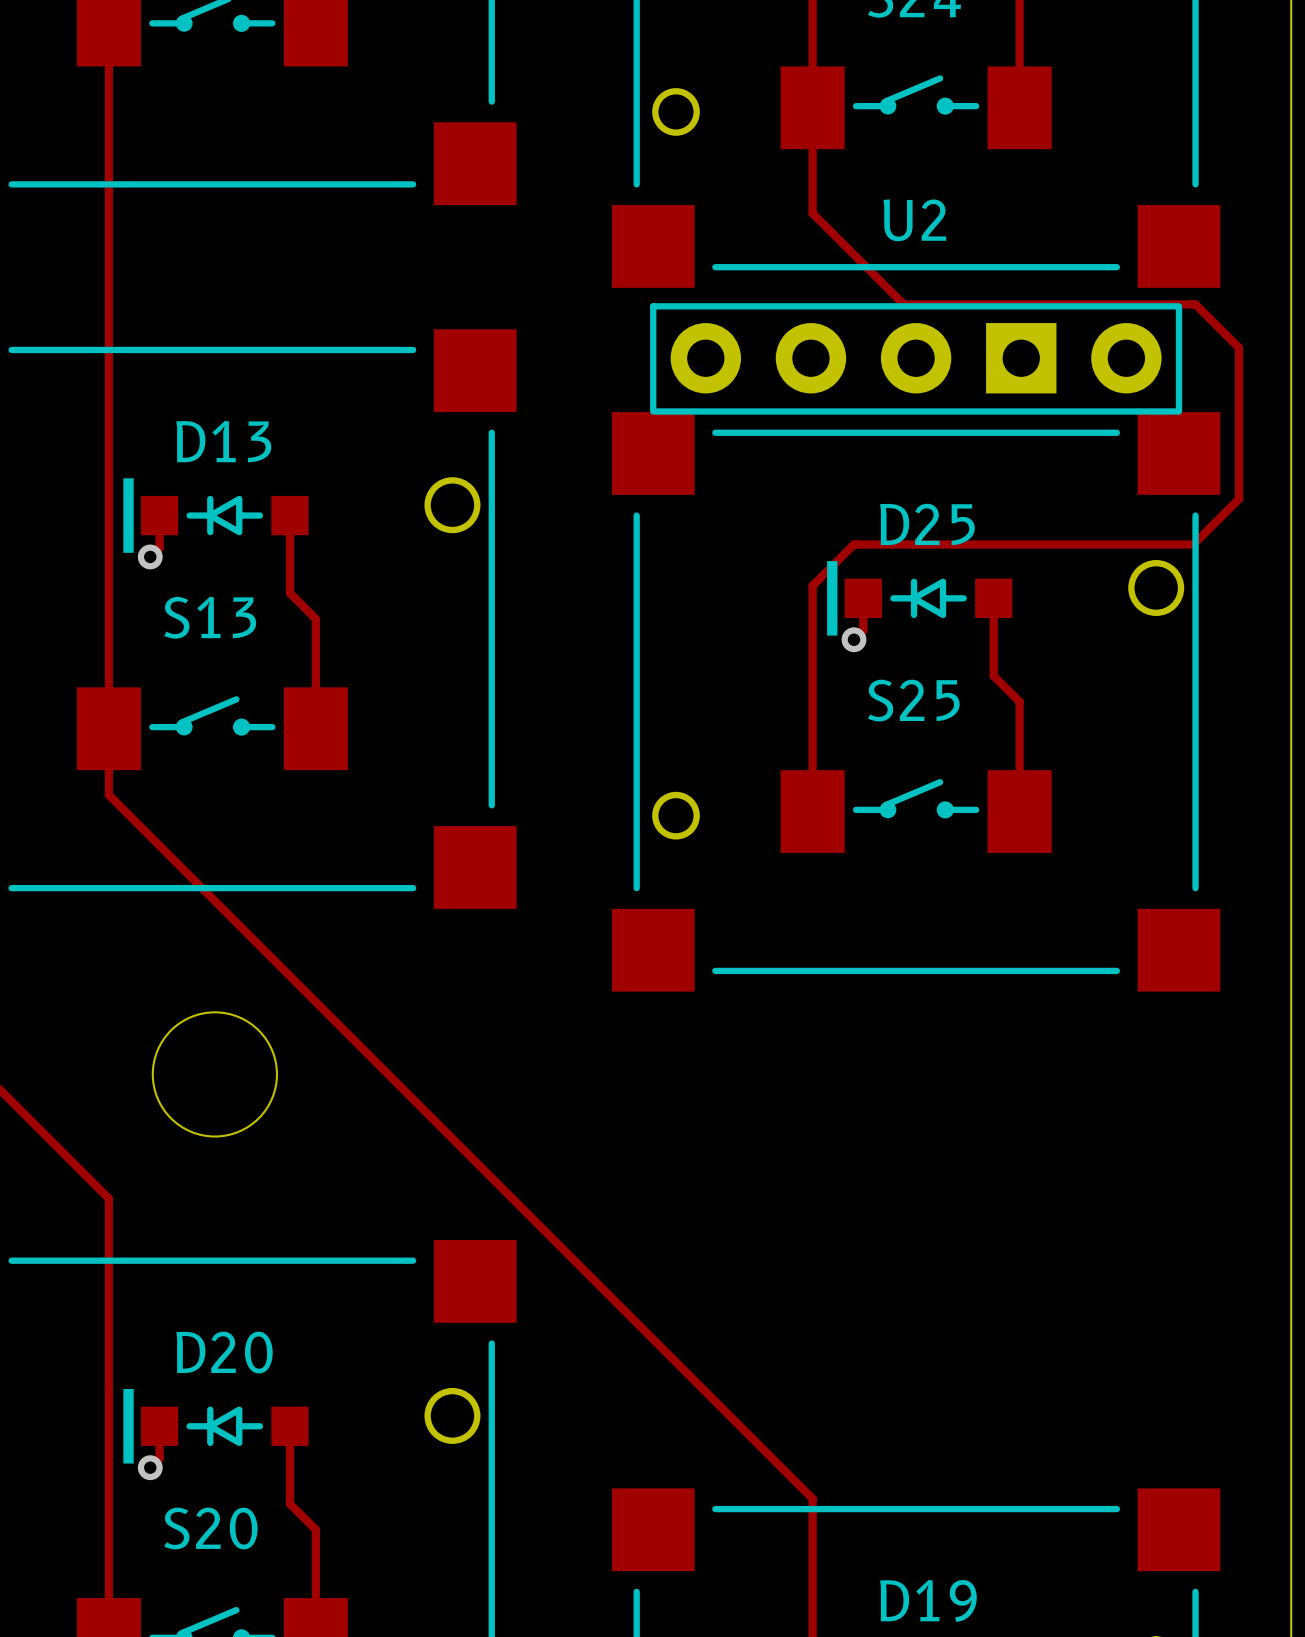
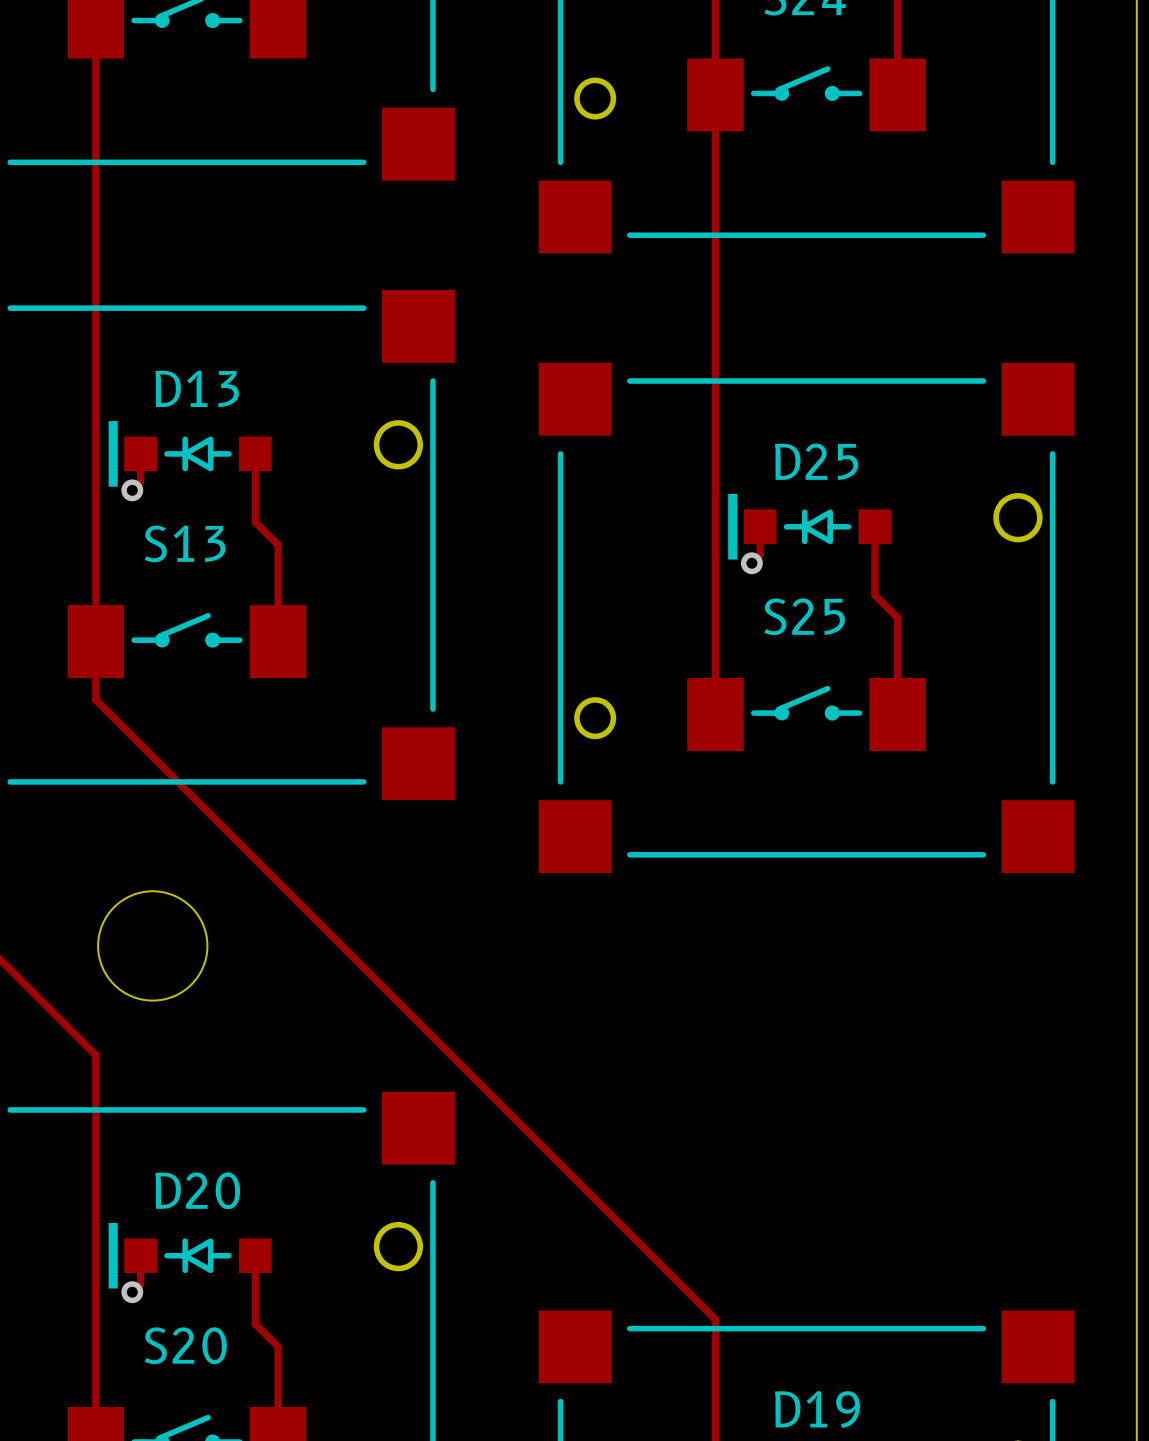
track: (812, 213) (903, 304) (1195, 304) (1239, 347) (1239, 499) (1193, 544) (853, 544) (812, 585) -> (715, 187) (715, 515)
U2: (916, 358) -> none
round board edge position: (214, 1074) -> (152, 945)

